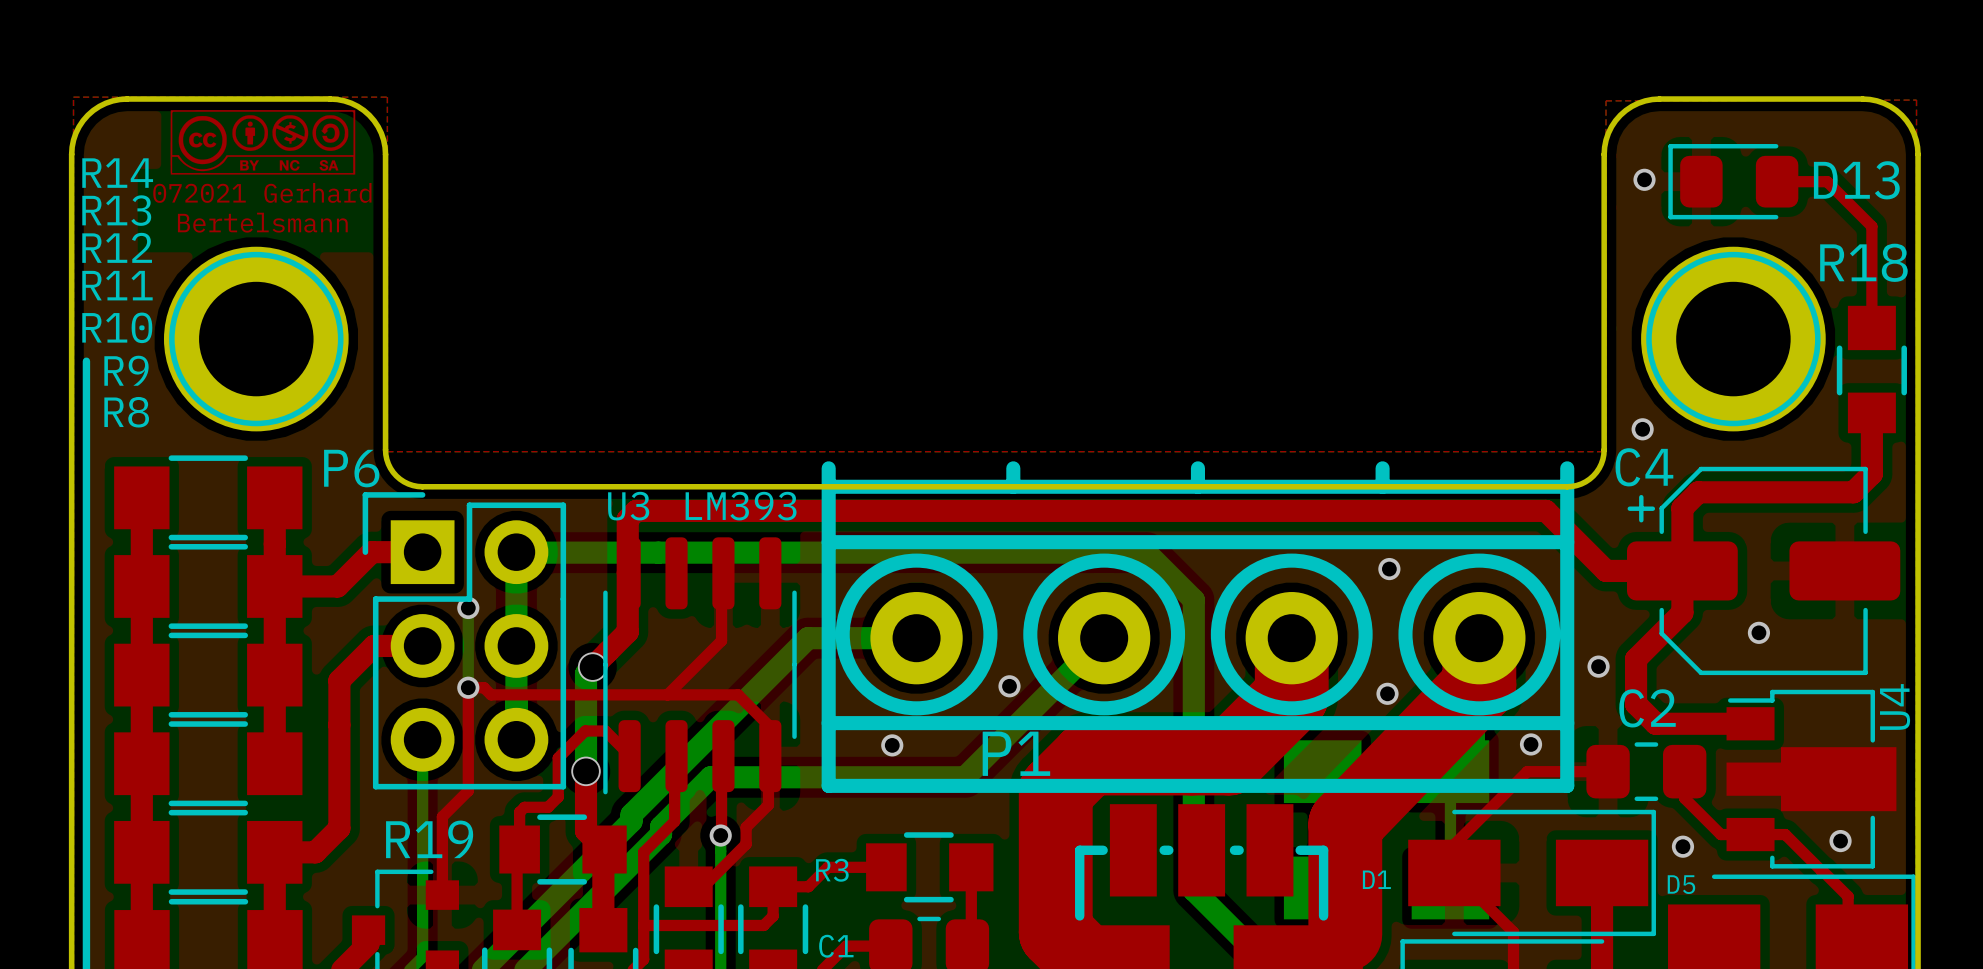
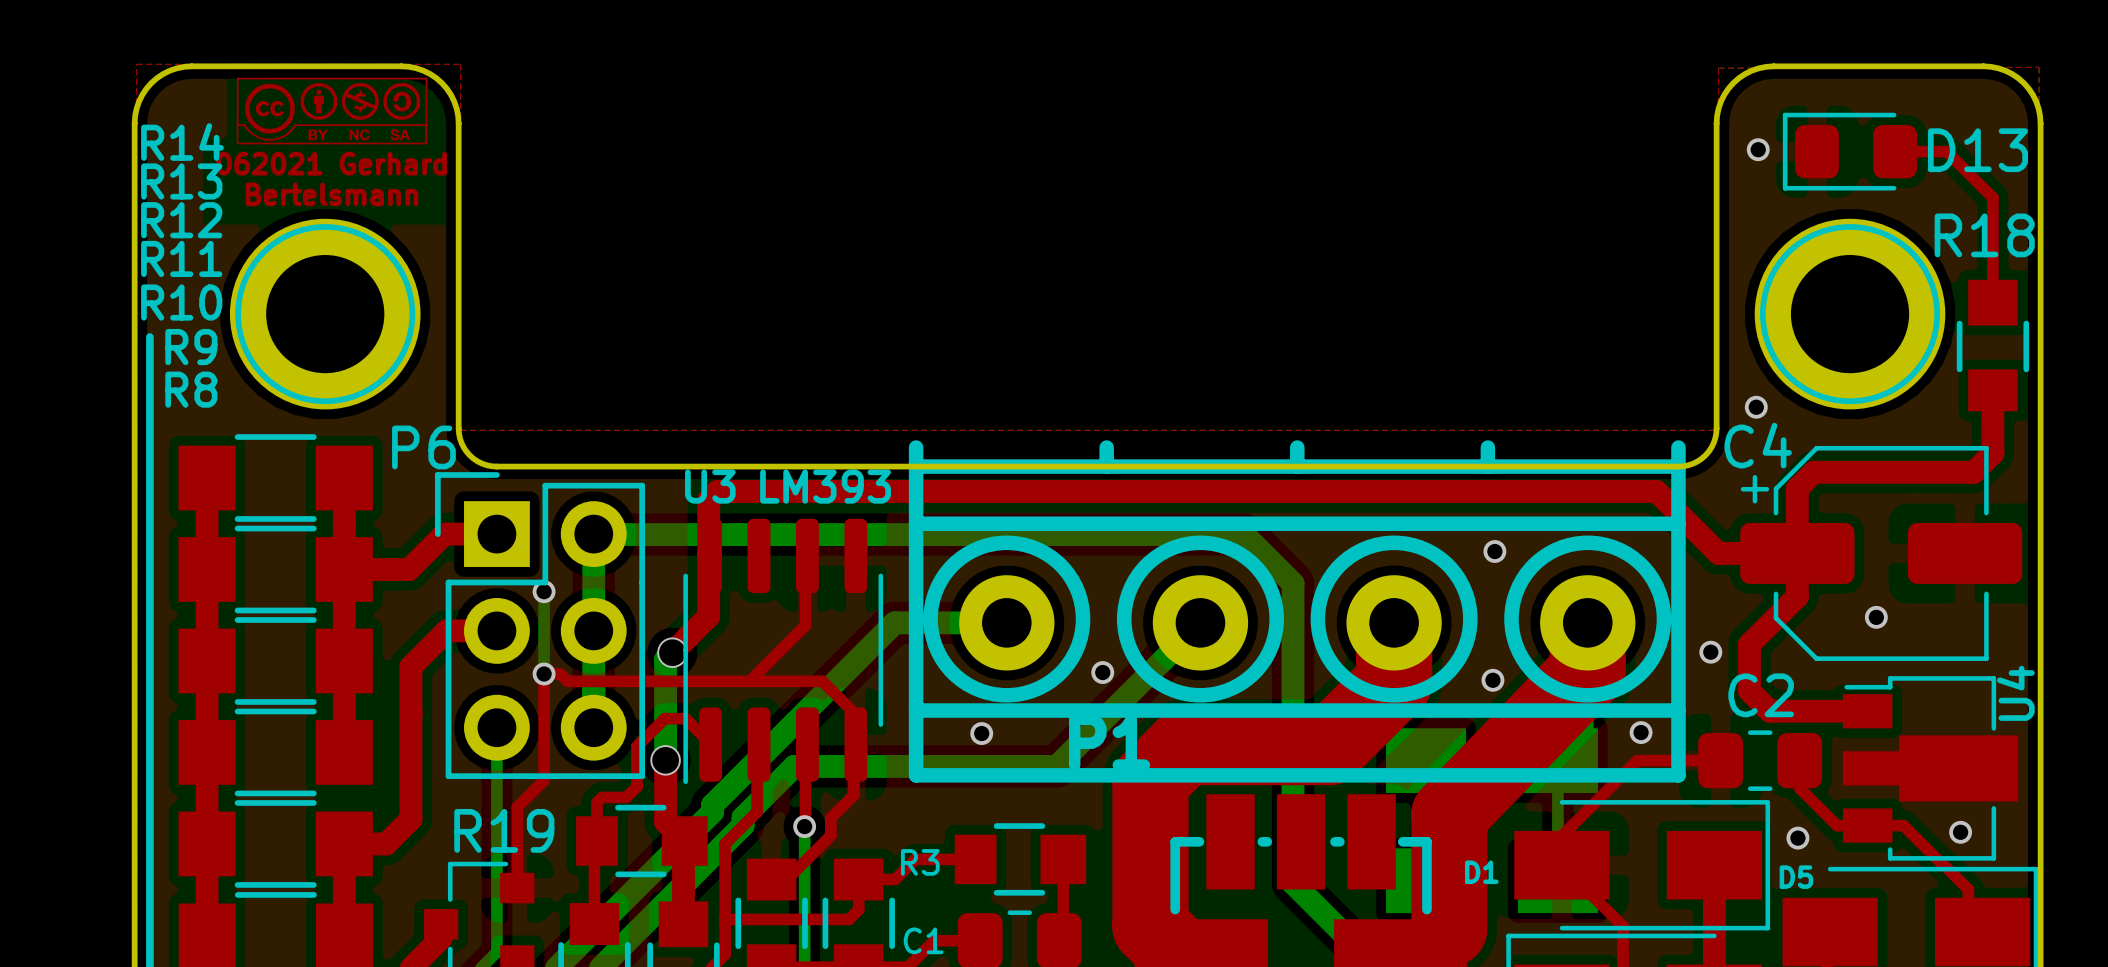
text: 072021 Gerhard (262, 192) -> 062021 Gerhard (331, 163)

